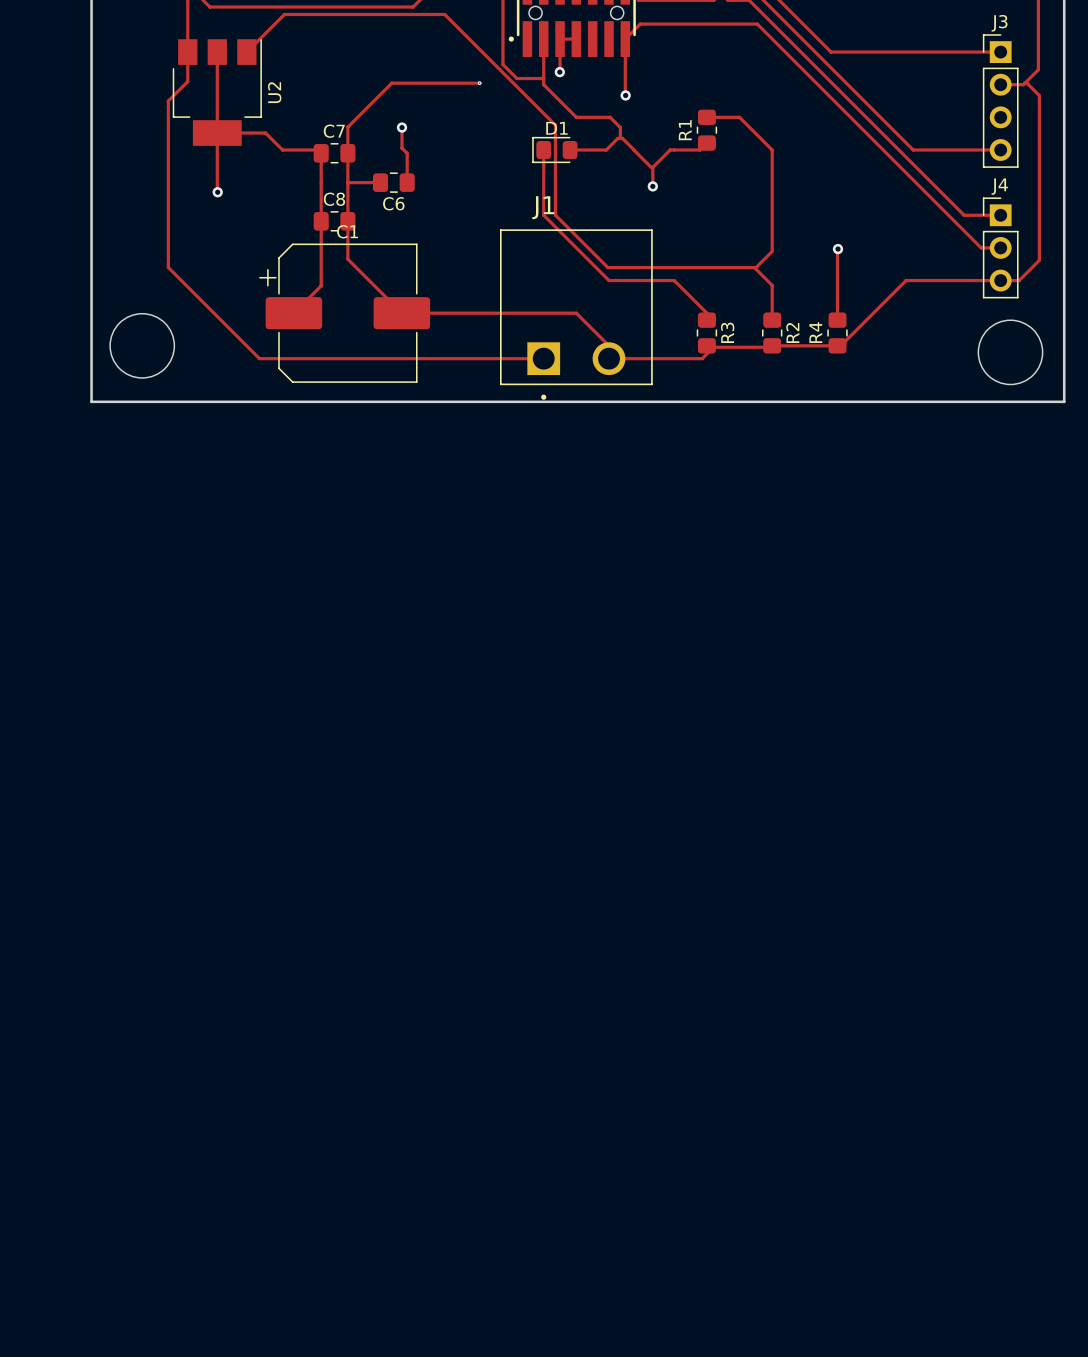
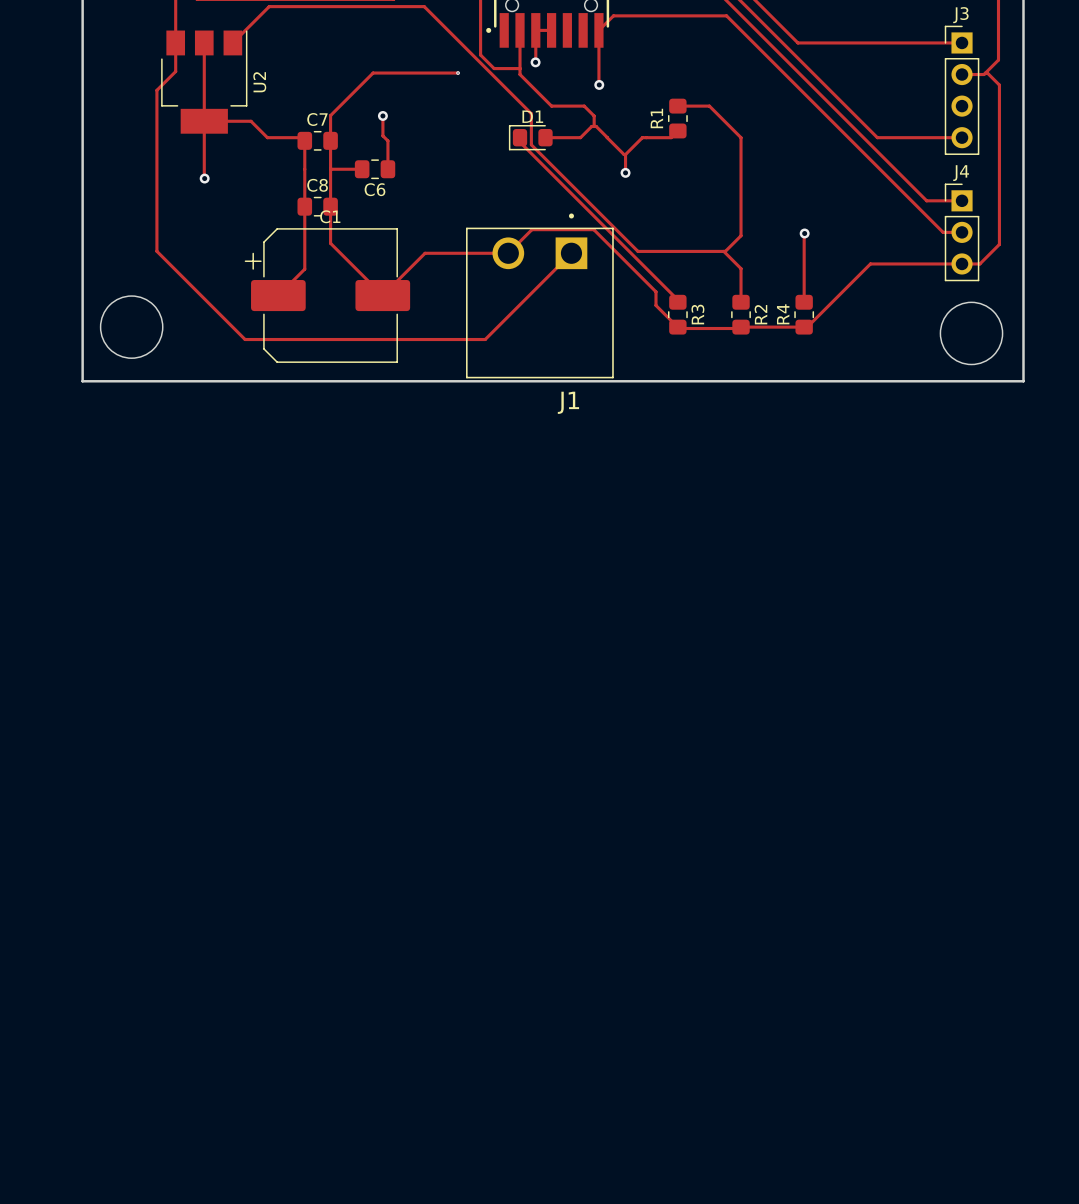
track: (543, 154) (543, 215) (609, 280) (674, 280) (706, 313) (706, 317) -> (520, 142) (677, 300)
track: (555, 157) (555, 215) (607, 267) (665, 267) -> (531, 144) (637, 251)
track: (401, 313) (576, 313) (609, 345) (609, 358) (702, 358) (713, 347) -> (382, 295) (425, 253) (508, 253) (531, 229) (593, 229) (656, 291) (656, 305) (677, 327)
J1 rotation: 0° (576, 314) -> 180° (539, 295)
track: (507, 358) (543, 358) -> (485, 339) (569, 254)

